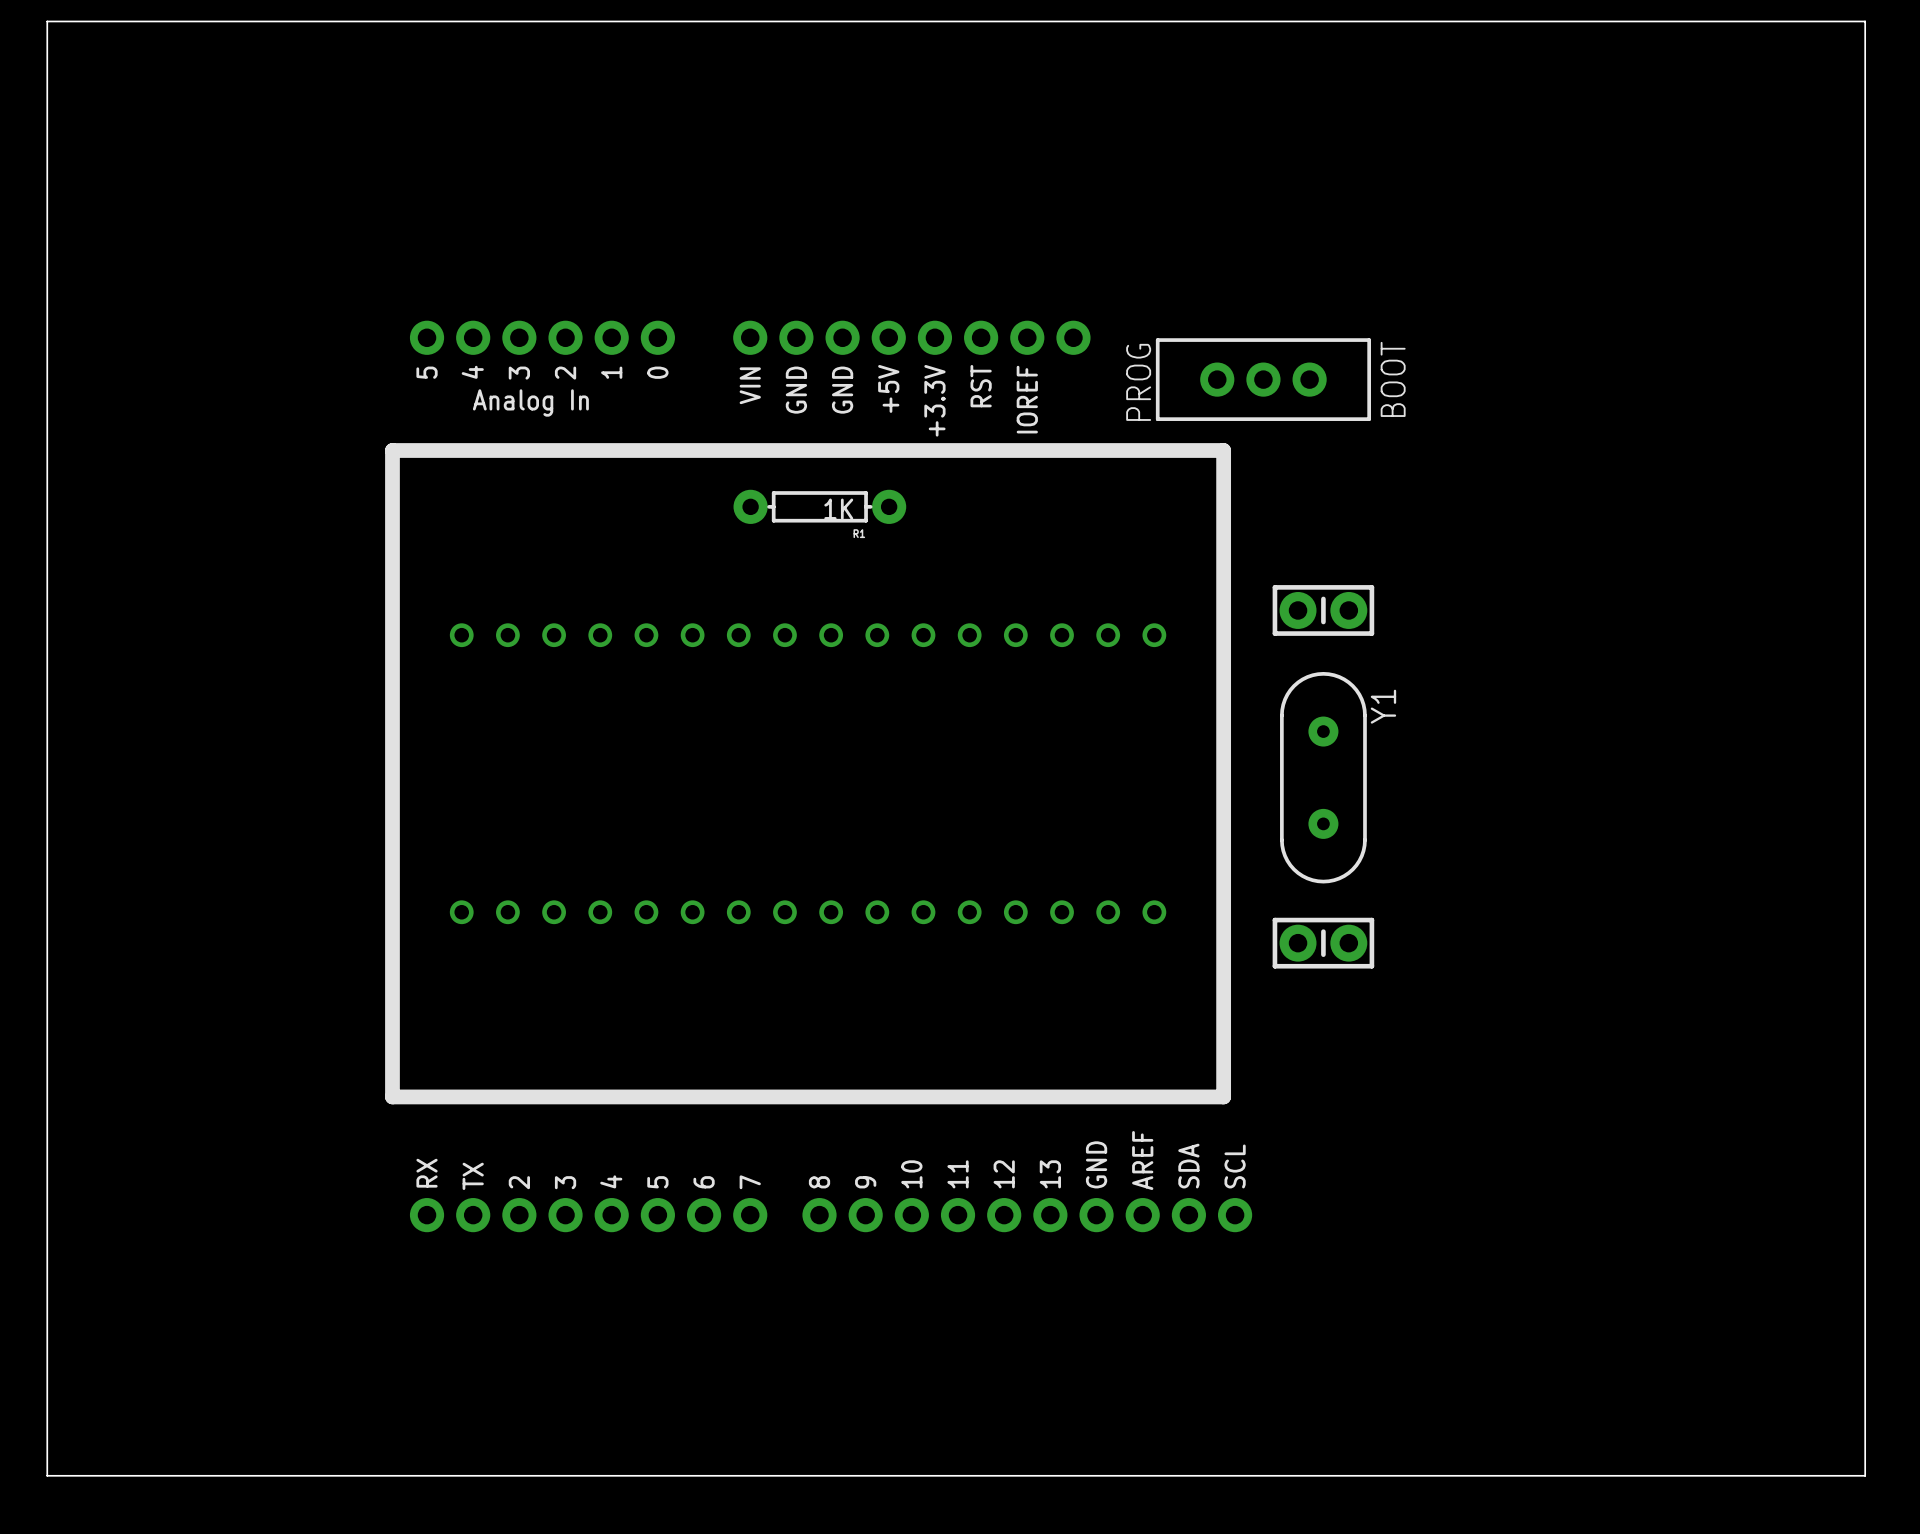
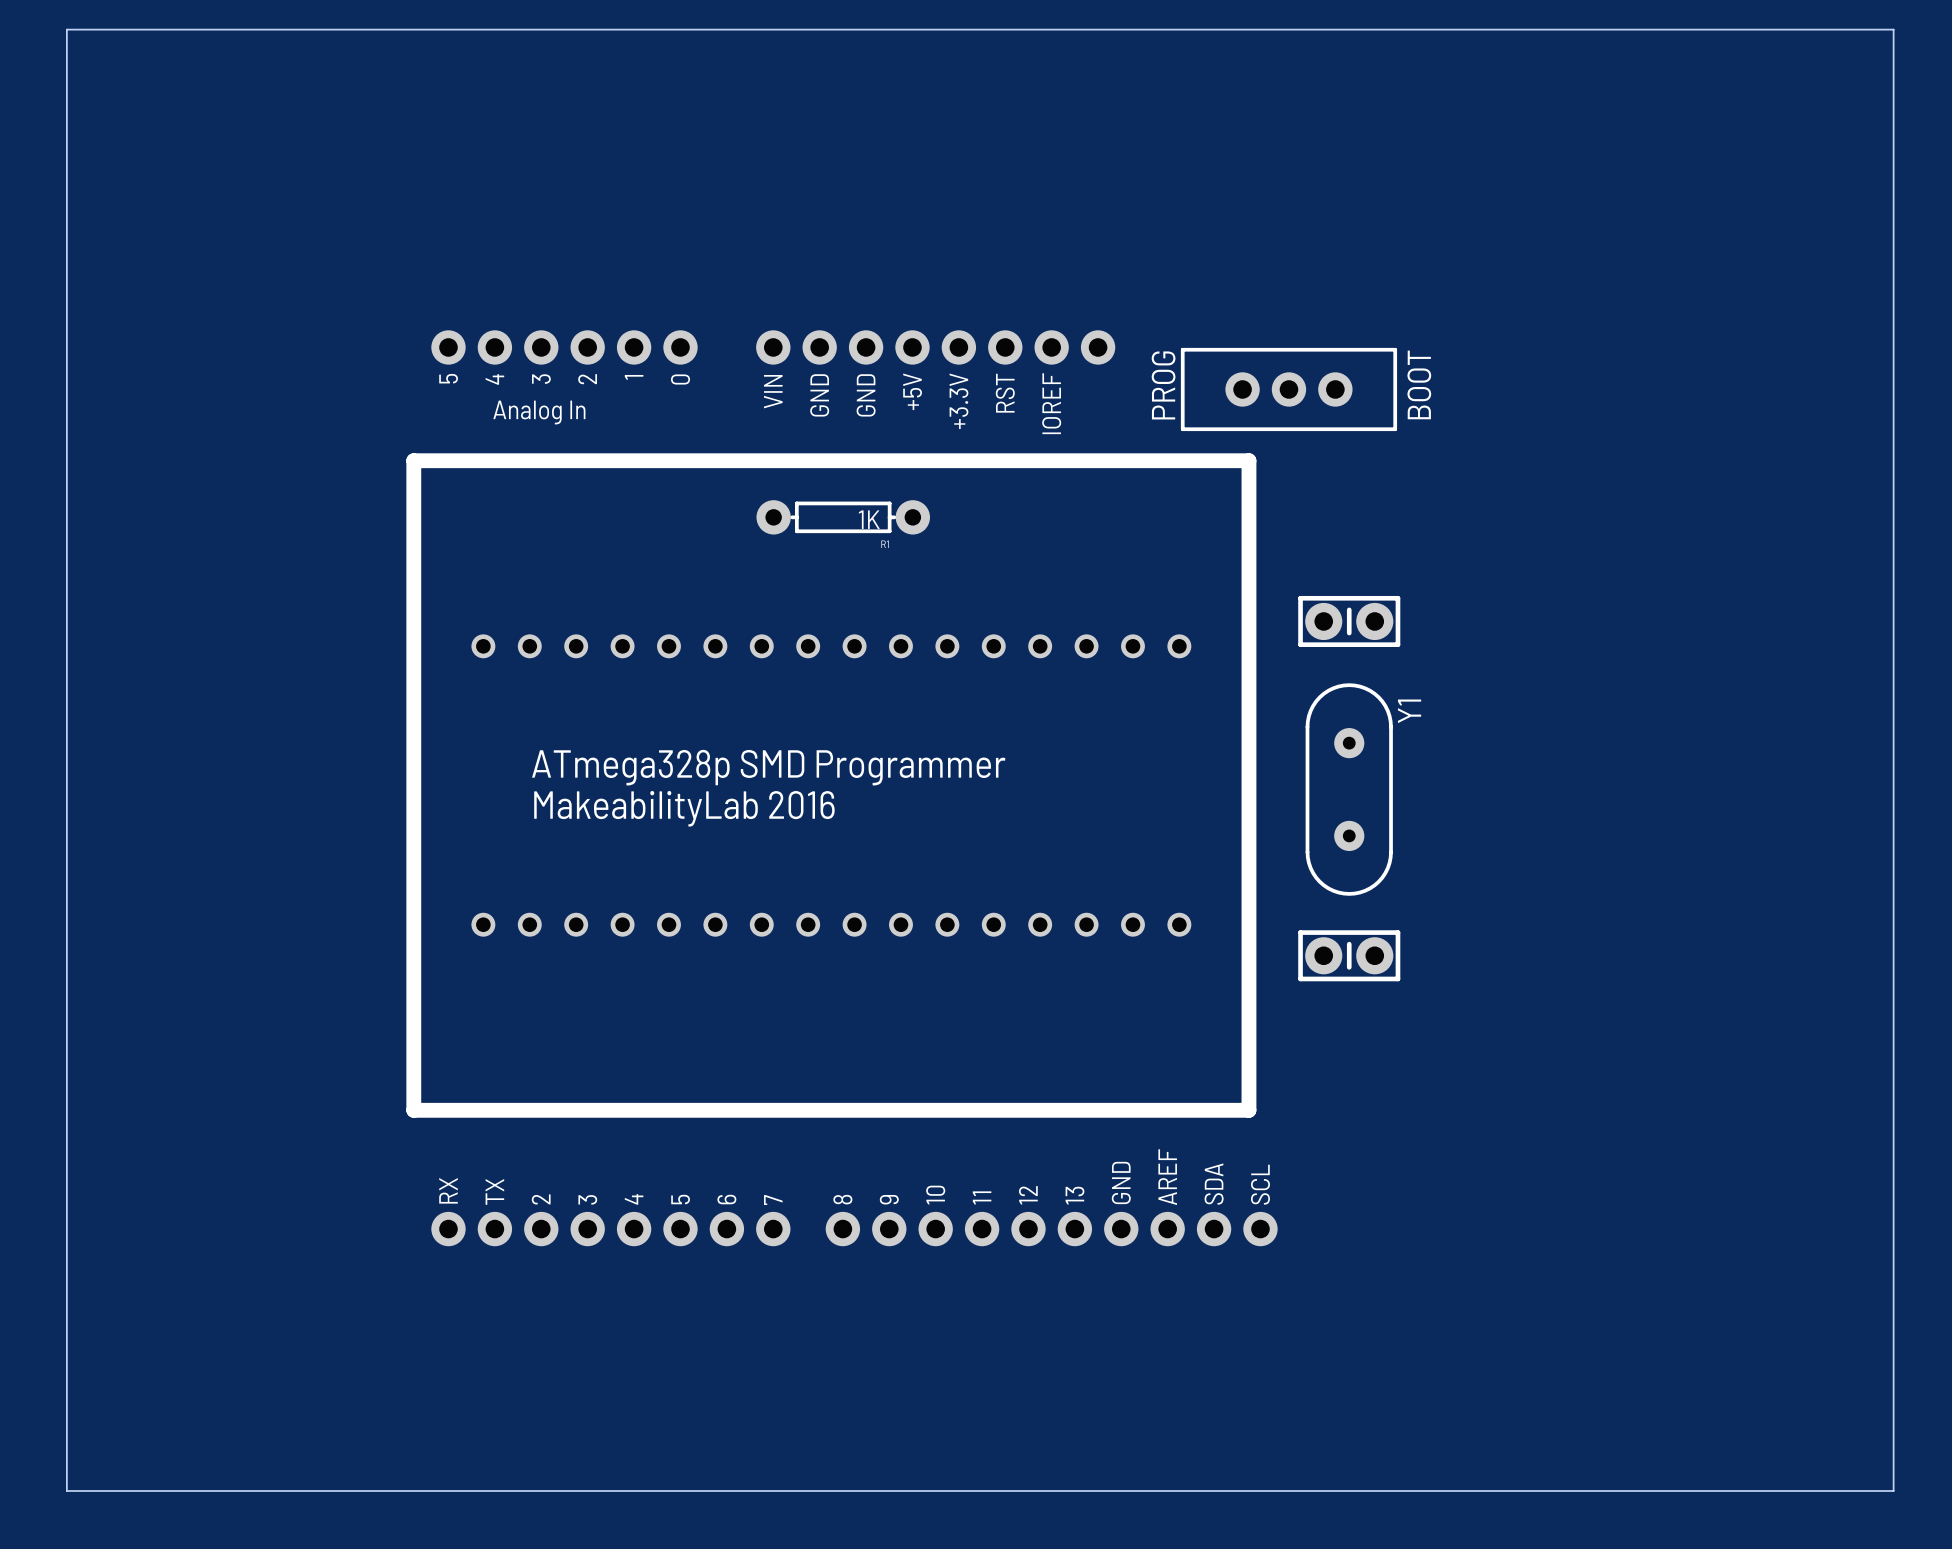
text: none -> ATmega328p SMD Programmer (768, 767)
text: none -> MakeabilityLab 2016 (684, 808)

